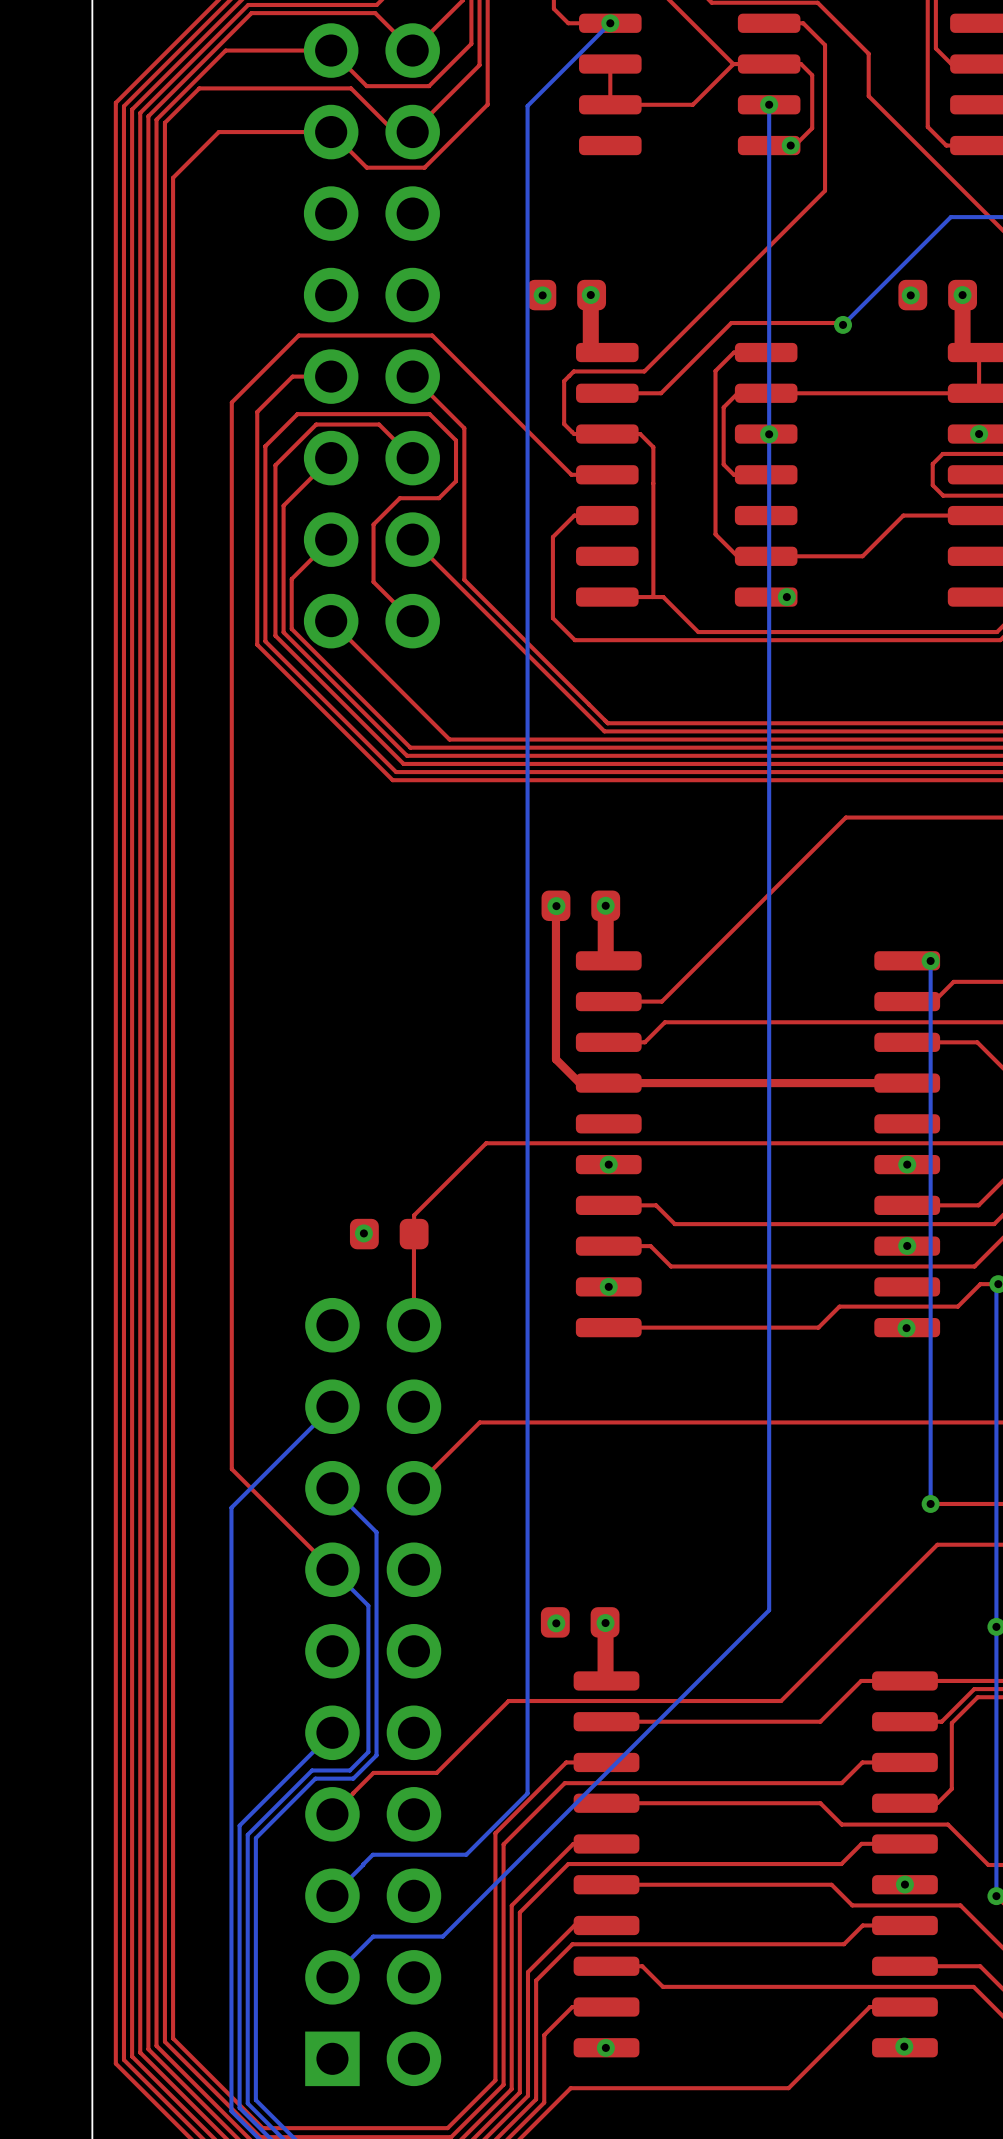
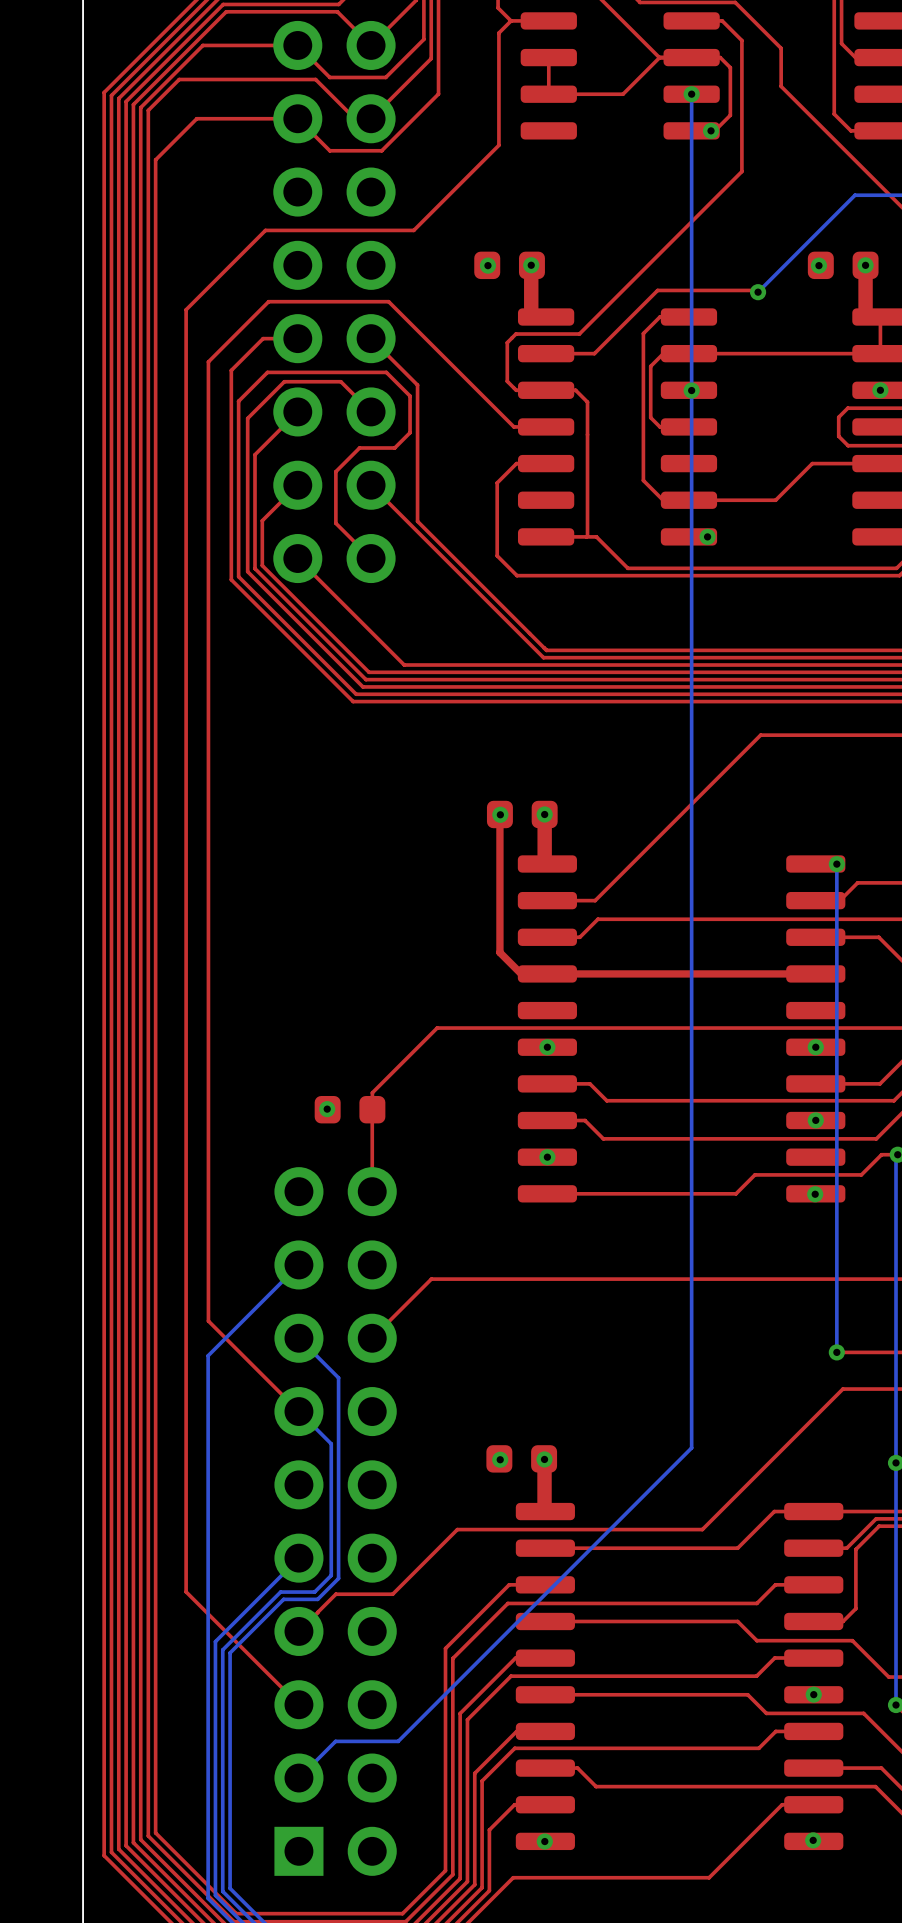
top track: none -> (511, 20) (498, 33) (498, 145) (413, 230) (265, 230) (186, 309) (186, 1591) (298, 1704)
bottom track: (610, 23) (527, 106) (527, 1793) (466, 1854) (372, 1854) (332, 1895) -> none
via: (610, 23) -> none

